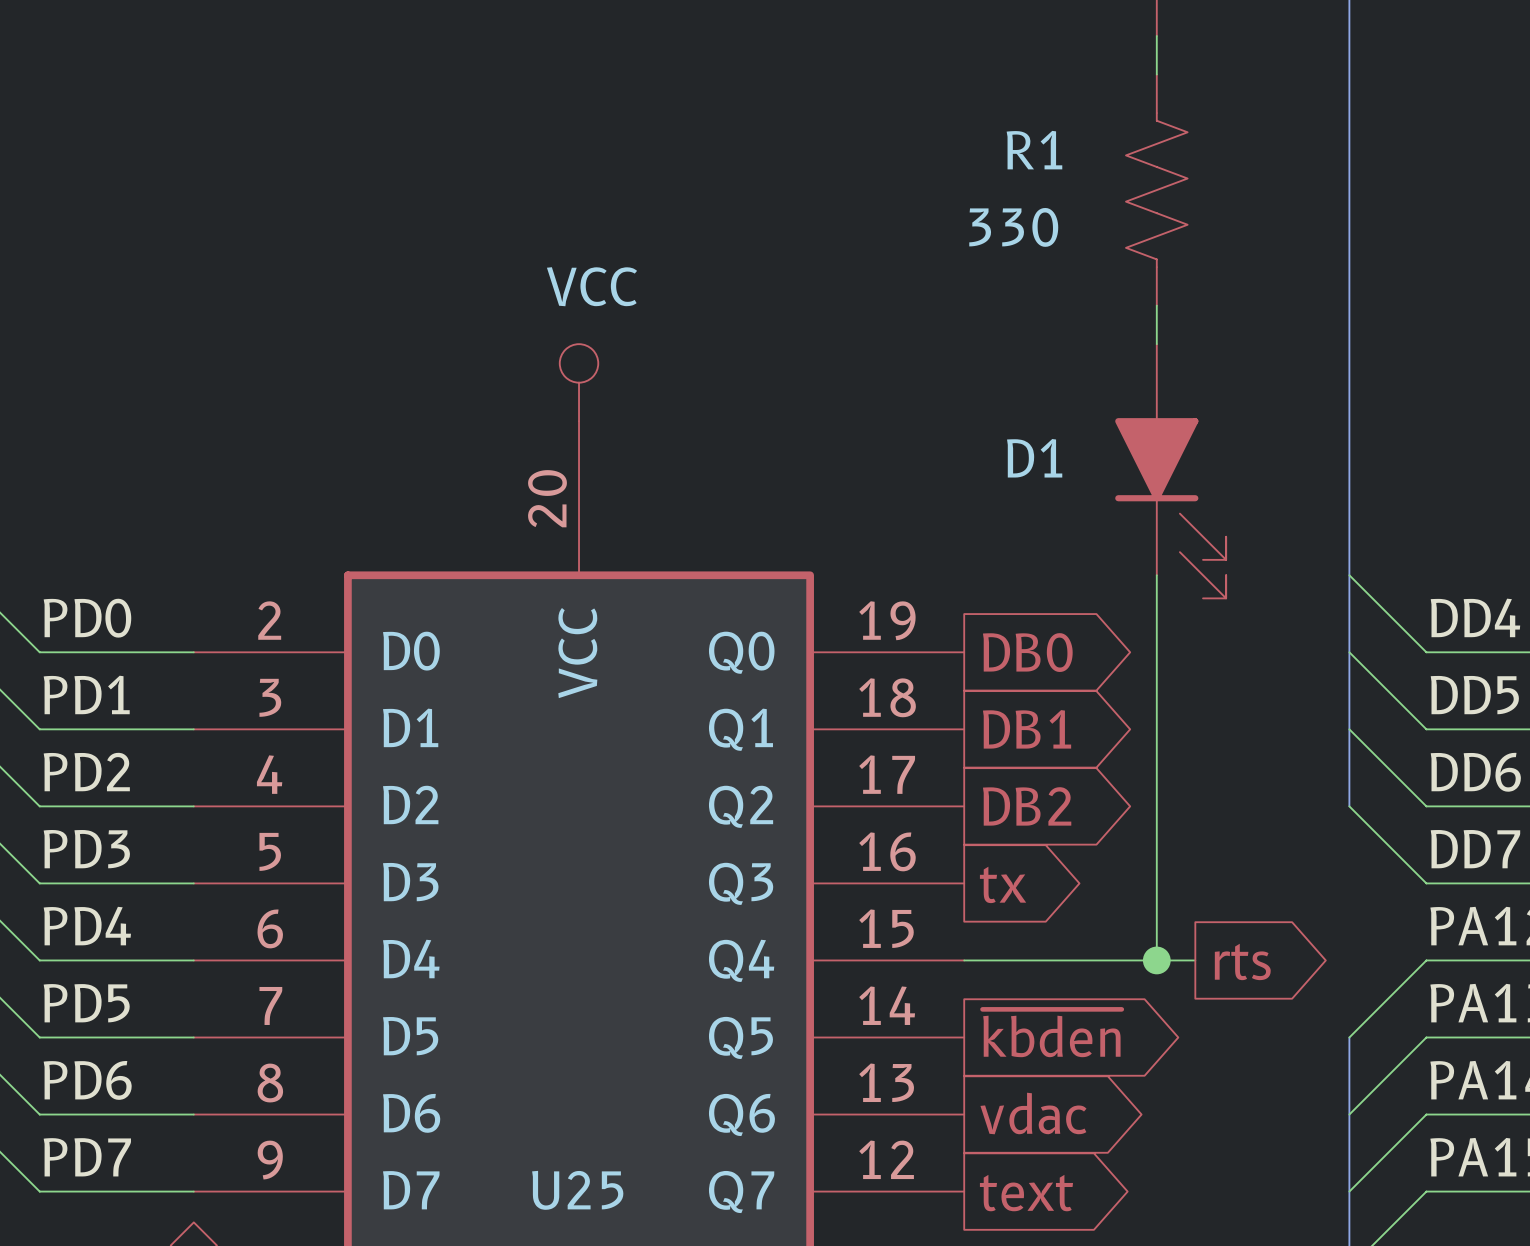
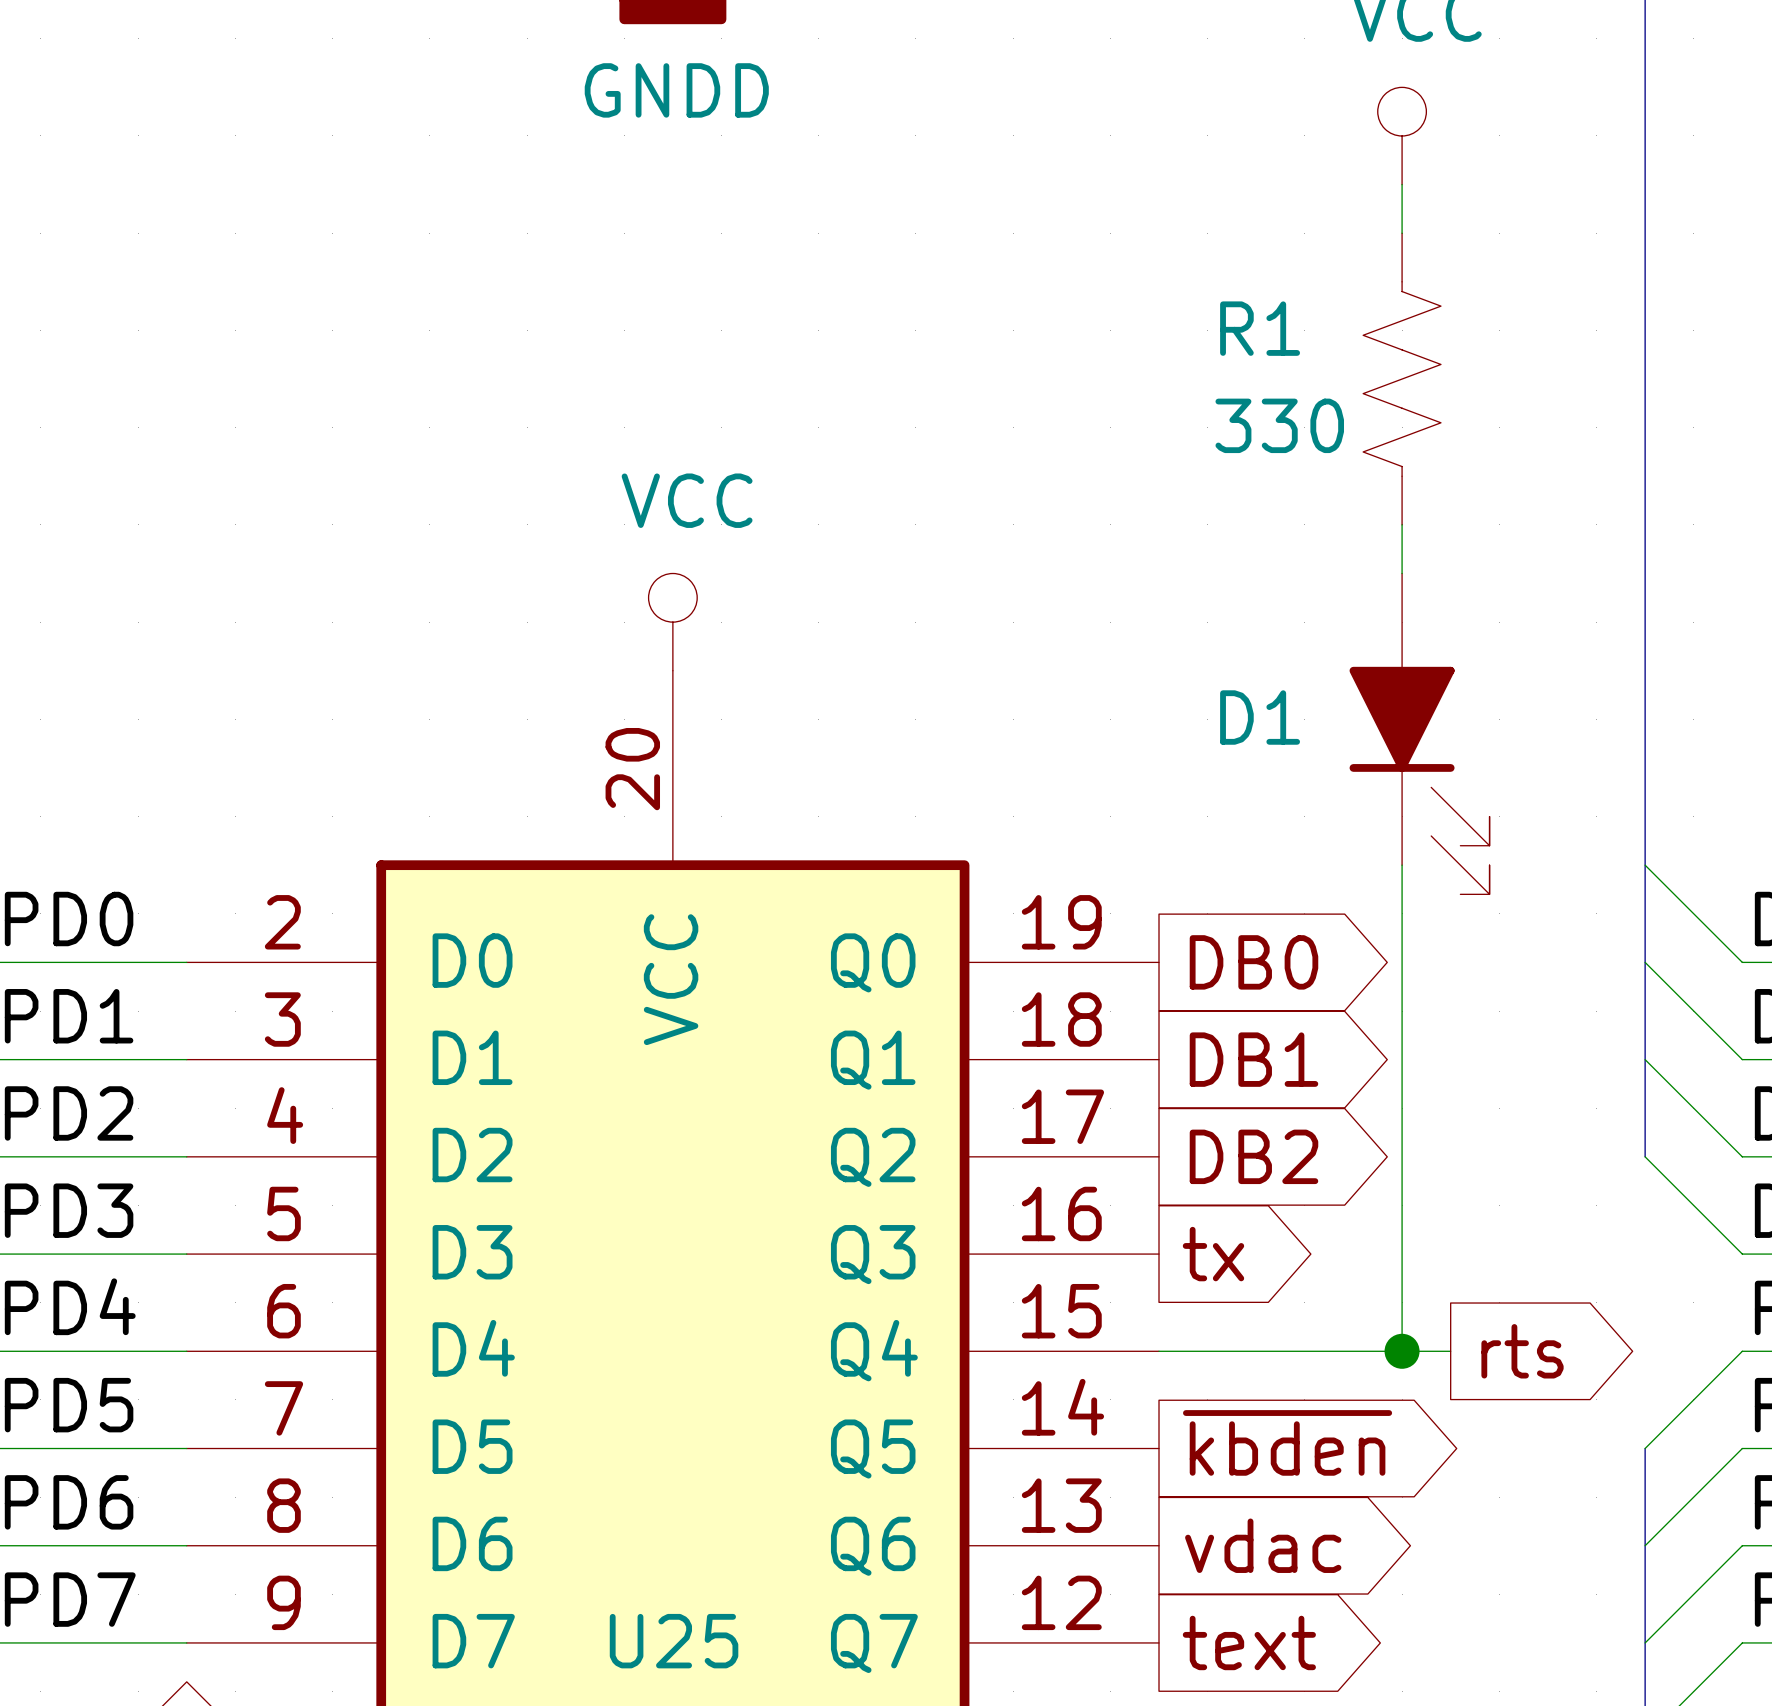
R1 value position: 330 (1013, 227) -> 330 (1279, 425)

